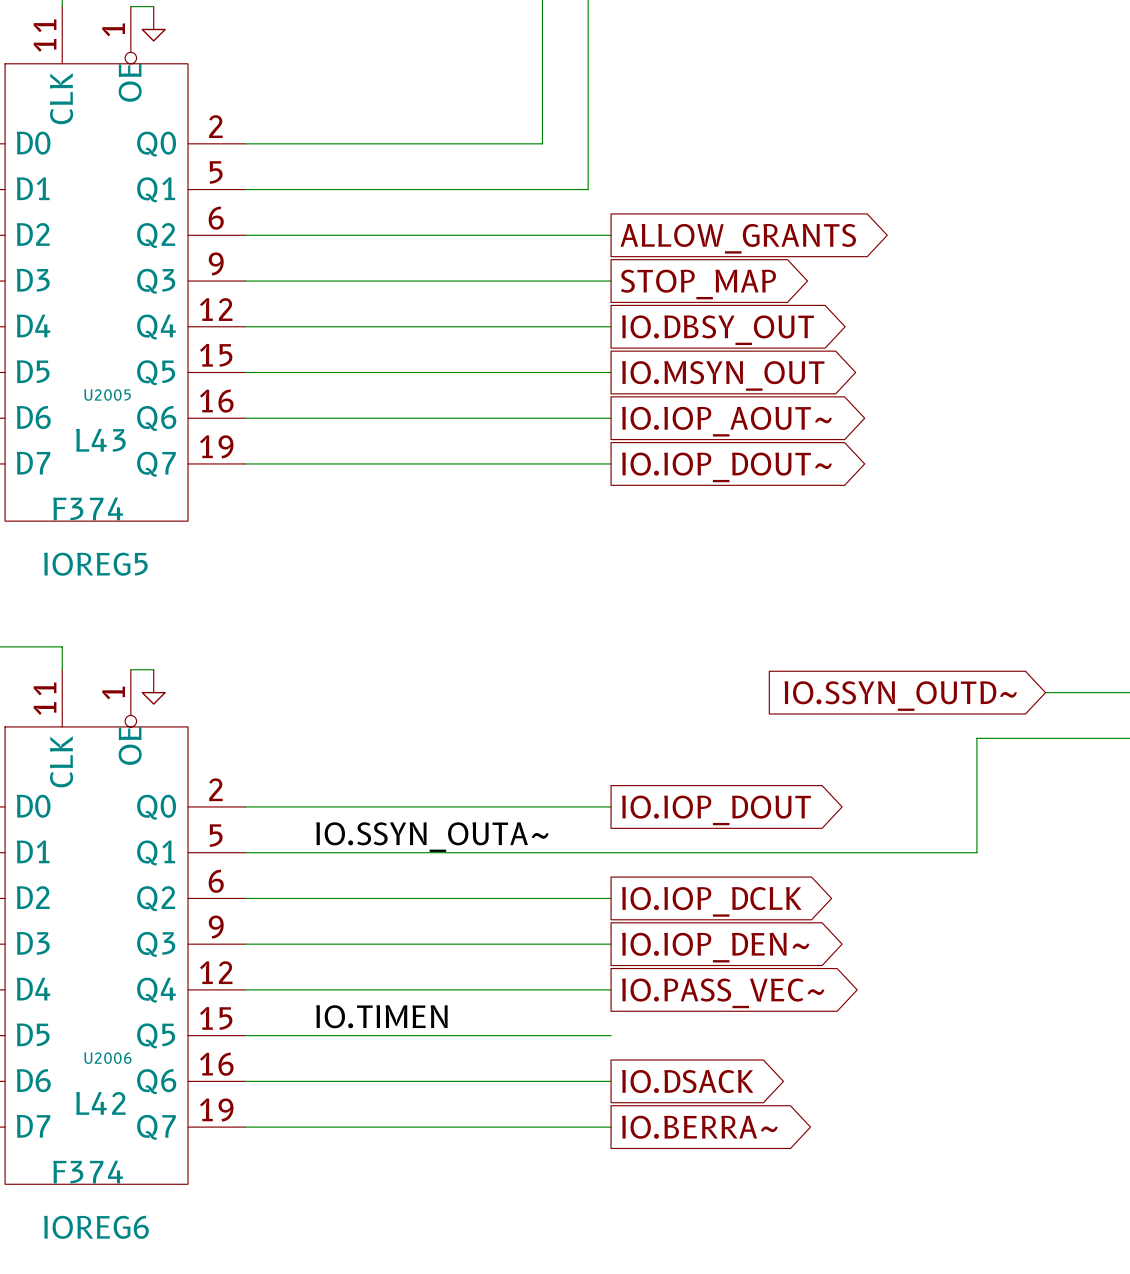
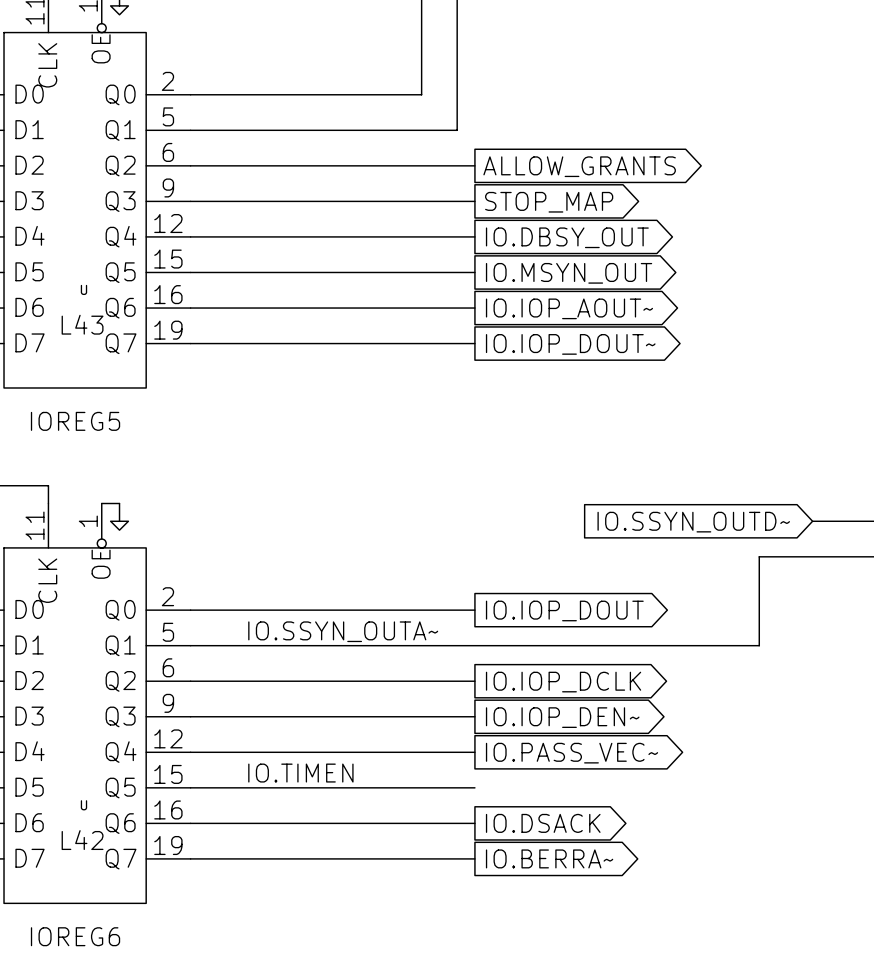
U2005 name: U2005 (107, 395) -> U (83, 289)
U2005 value: F374 (88, 508) -> none
U2006 name: U2006 (107, 1058) -> U (83, 805)
U2006 value: F374 (88, 1171) -> none

